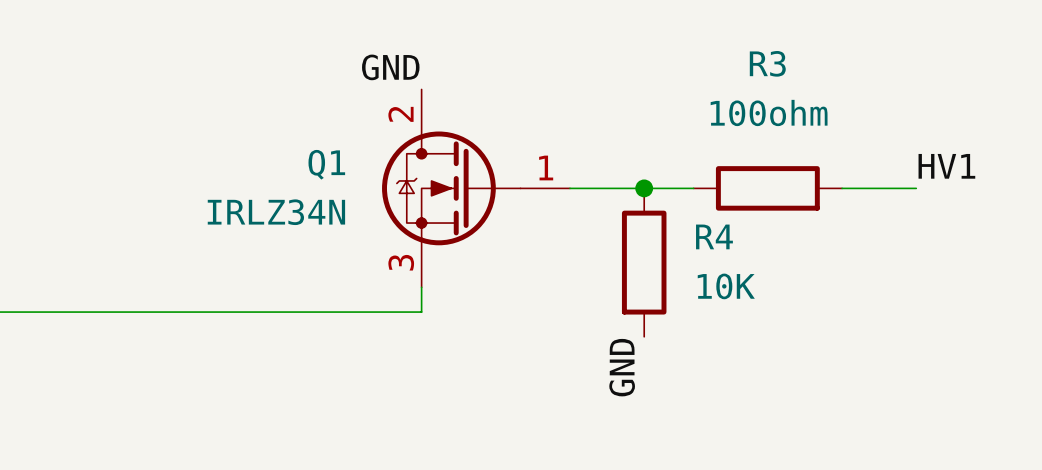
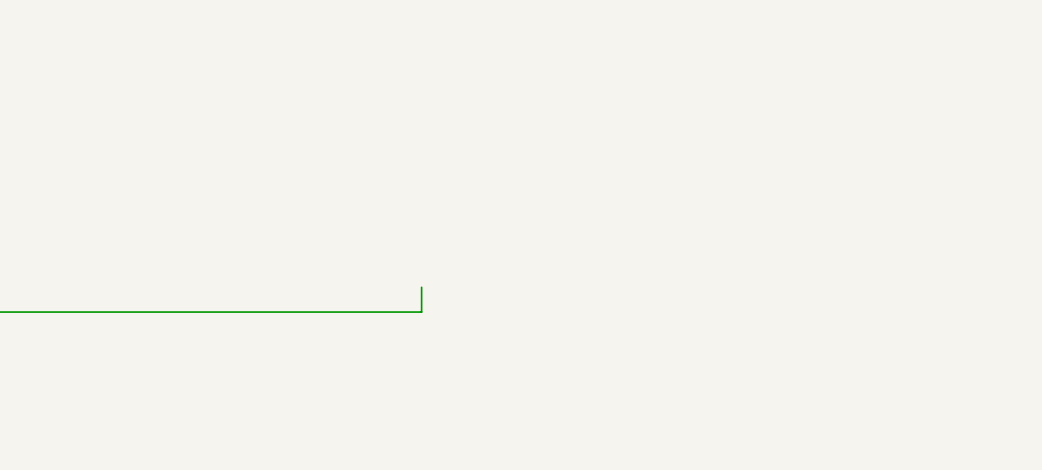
label: GND (390, 67) -> none
label: HV1 (946, 166) -> none
Q1: IRLZ34N (476, 188) -> none
wire: (570, 188) (693, 188) -> none
junction: (644, 188) -> none
R3: 100ohm (767, 188) -> none
wire: (842, 188) (916, 188) -> none
R4: 10K (644, 262) -> none
label: GND (622, 367) -> none

